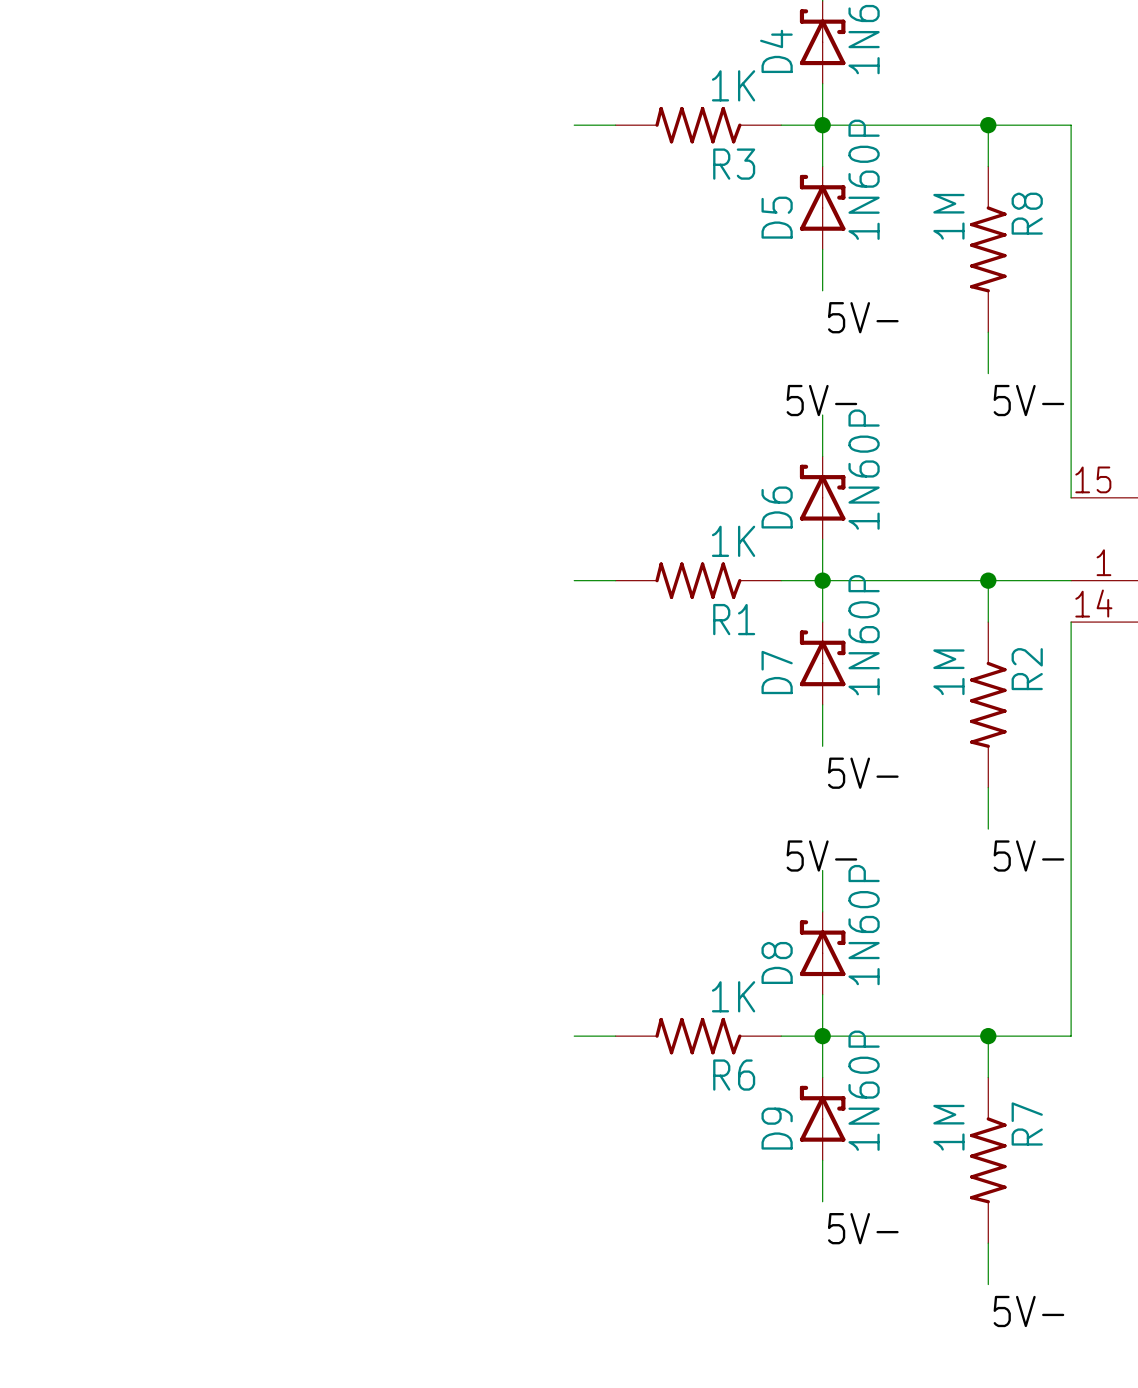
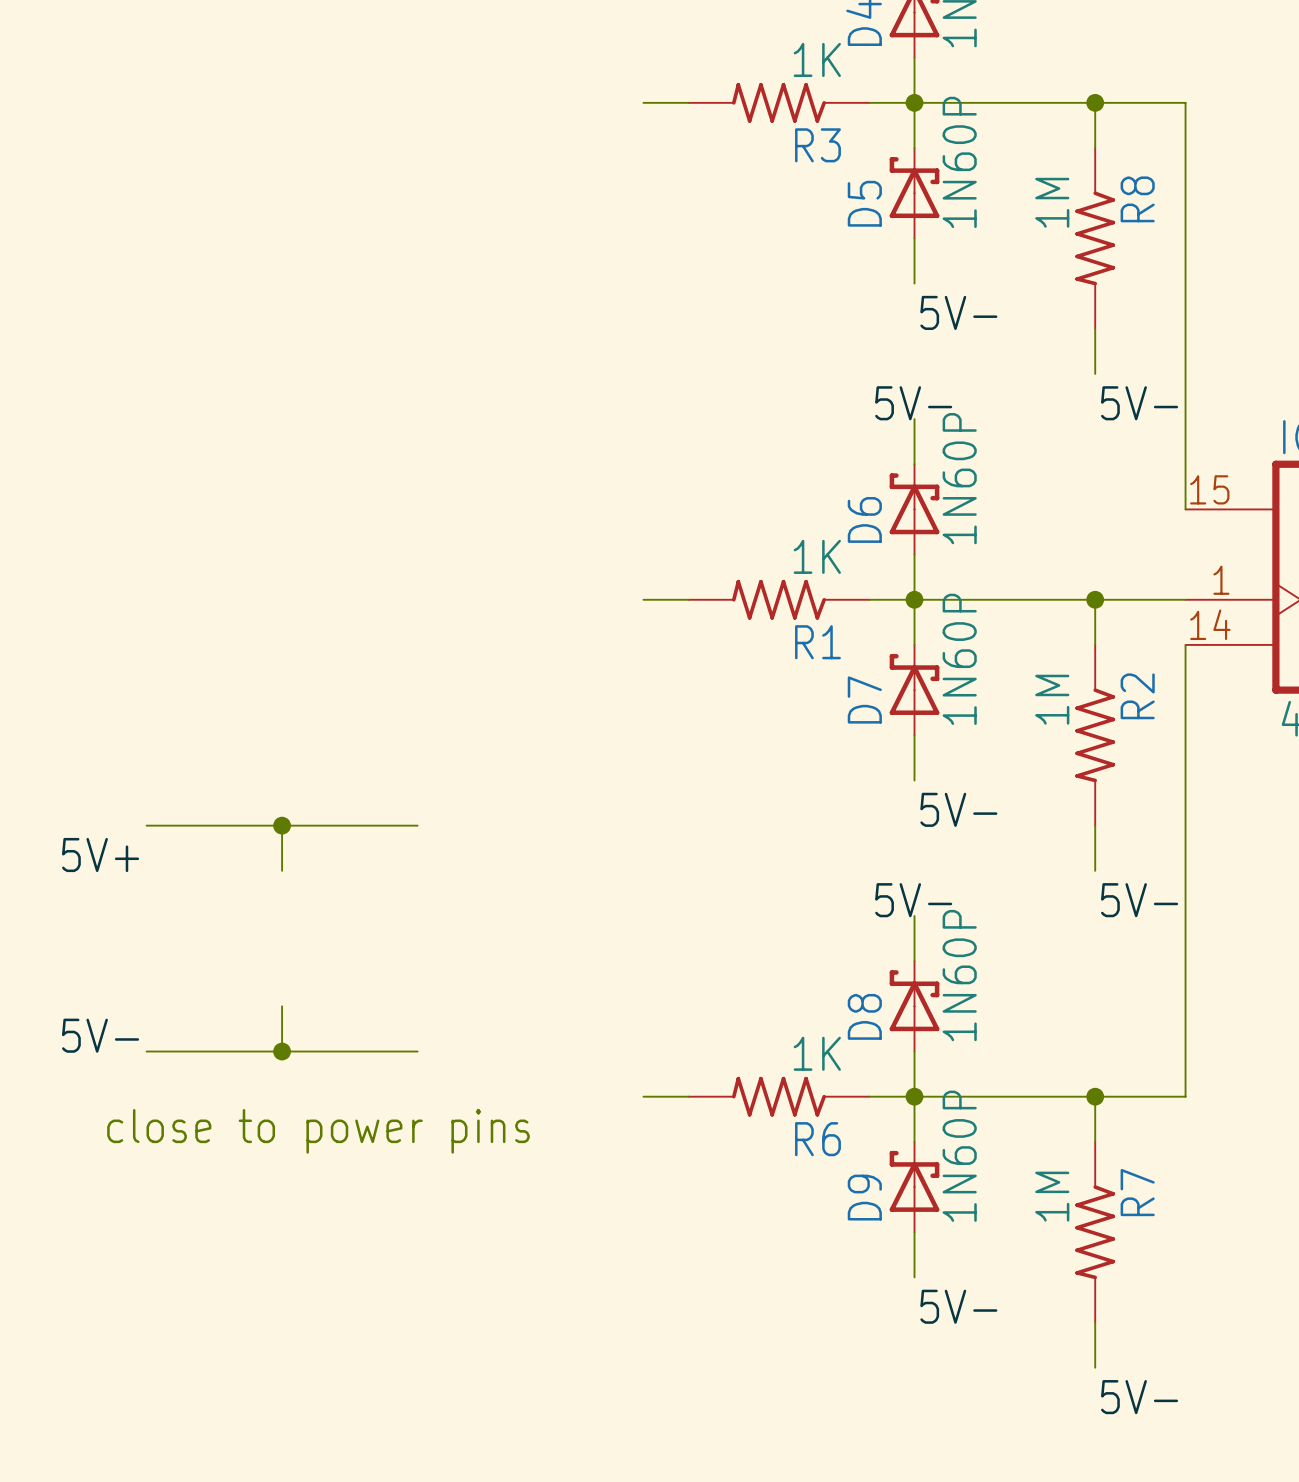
wire: none -> (146, 825) (417, 825)
wire: none -> (282, 825) (282, 870)
junction: none -> (282, 825)
label: none -> 5V+ (100, 855)
wire: none -> (282, 1006) (282, 1051)
label: none -> 5V- (100, 1035)
wire: none -> (146, 1051) (417, 1051)
junction: none -> (282, 1051)
text: none -> close to power pins (318, 1131)

